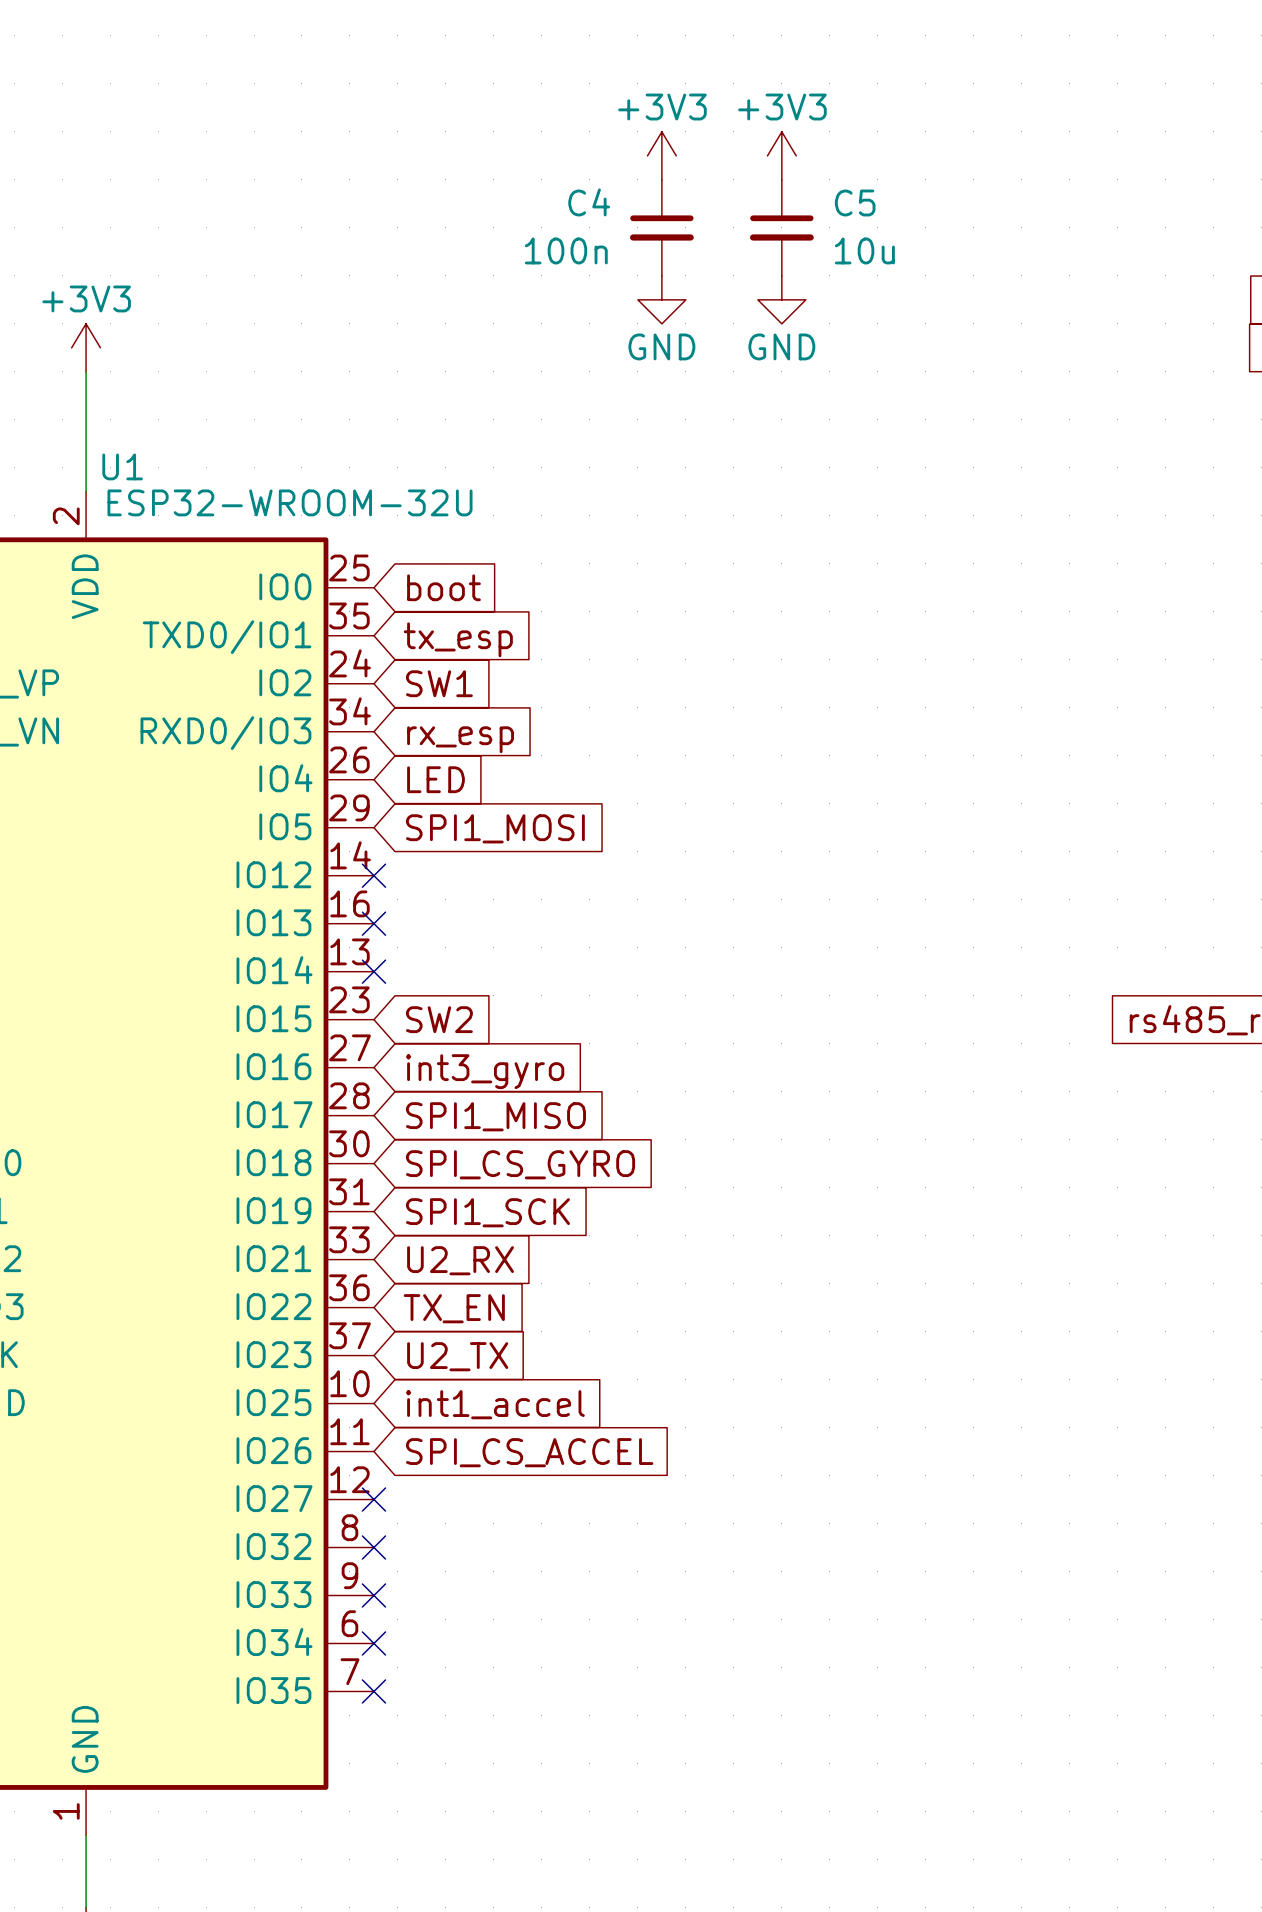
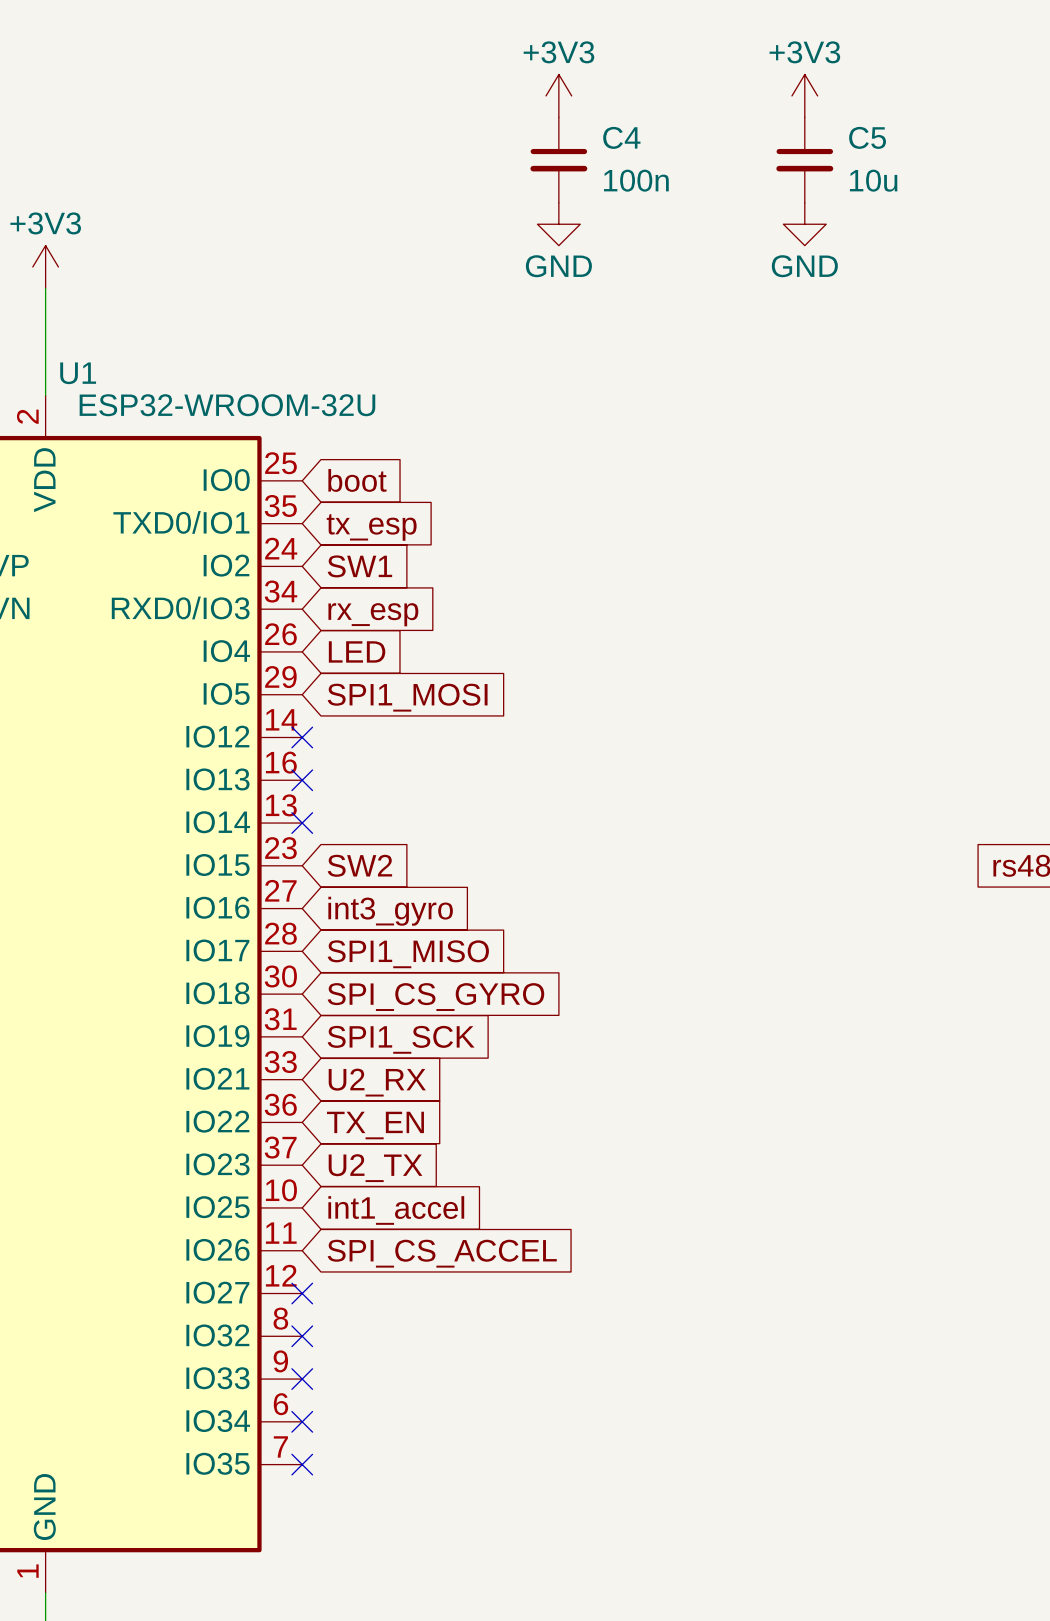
power symbol position: +3V3 (781, 155) -> +3V3 (804, 95)
C4 name position: C4 (589, 202) -> C4 (621, 137)
C5 position: (781, 227) -> (804, 160)
C4 value position: 100n (566, 250) -> 100n (636, 180)
power symbol position: GND (781, 299) -> GND (804, 224)

